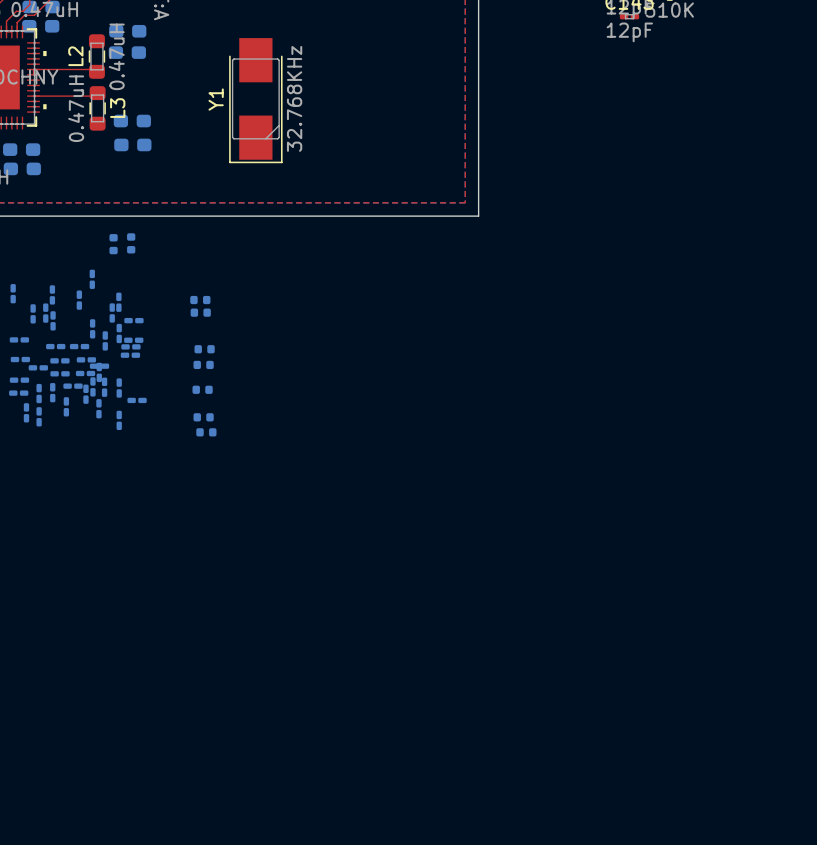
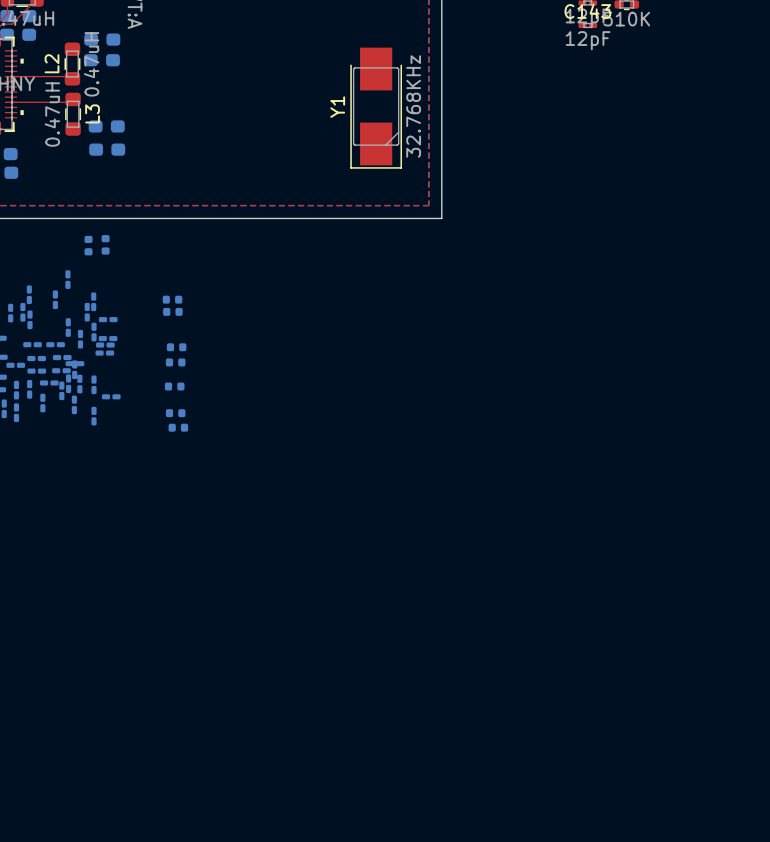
Y1 position: (255, 100) -> (376, 108)

